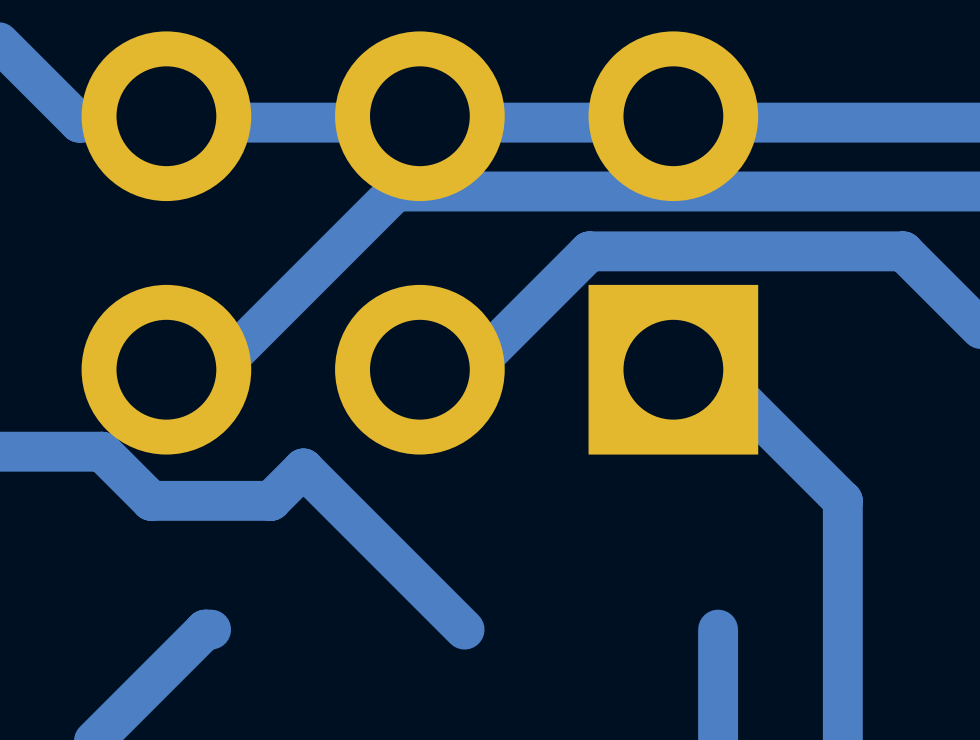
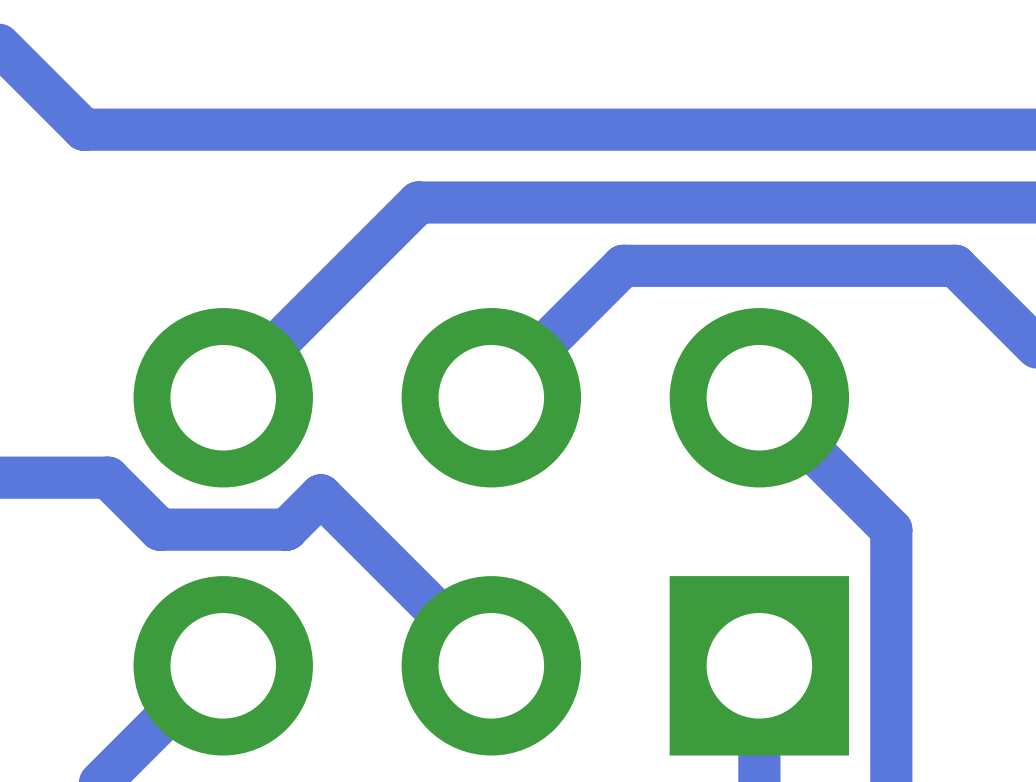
part position: (419, 242) -> (491, 531)

